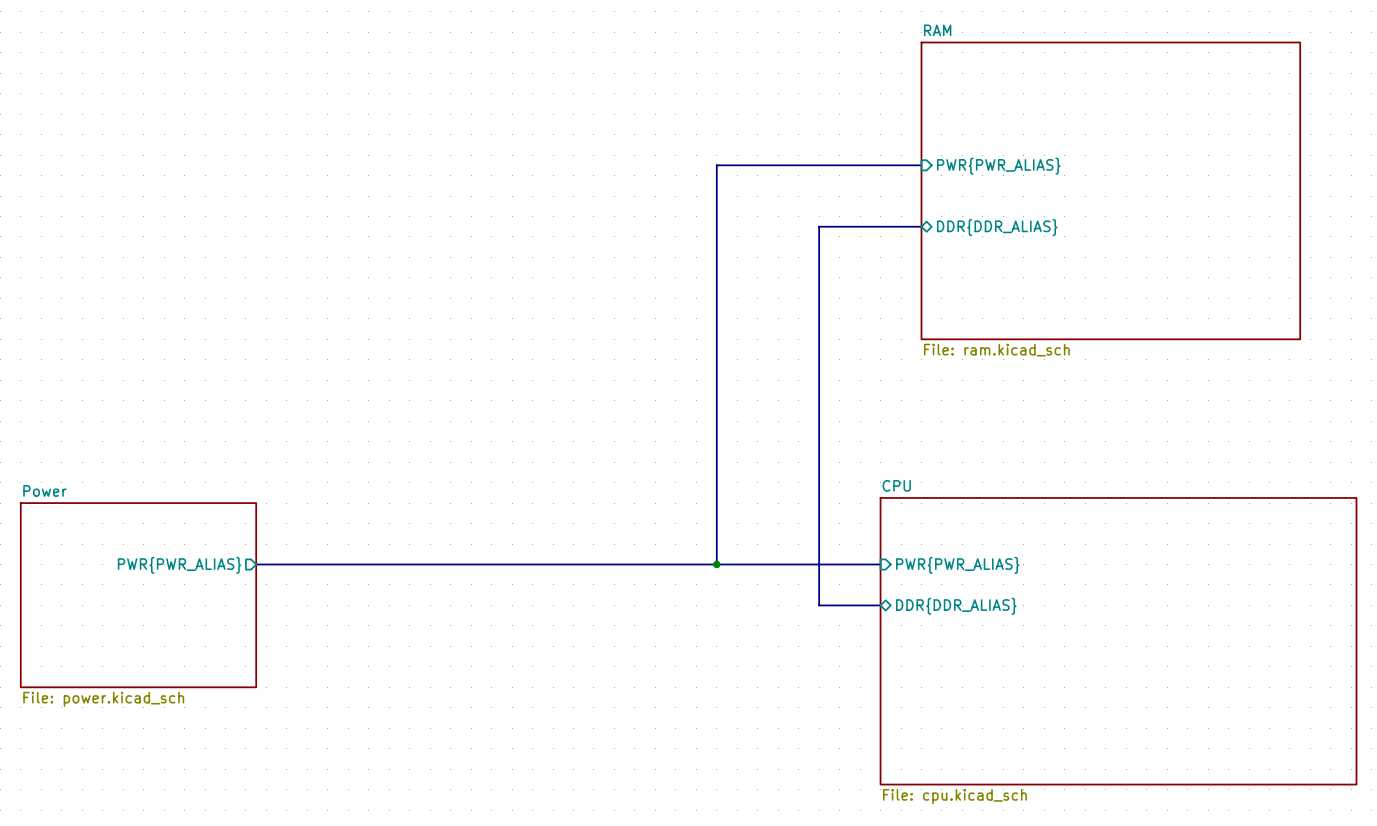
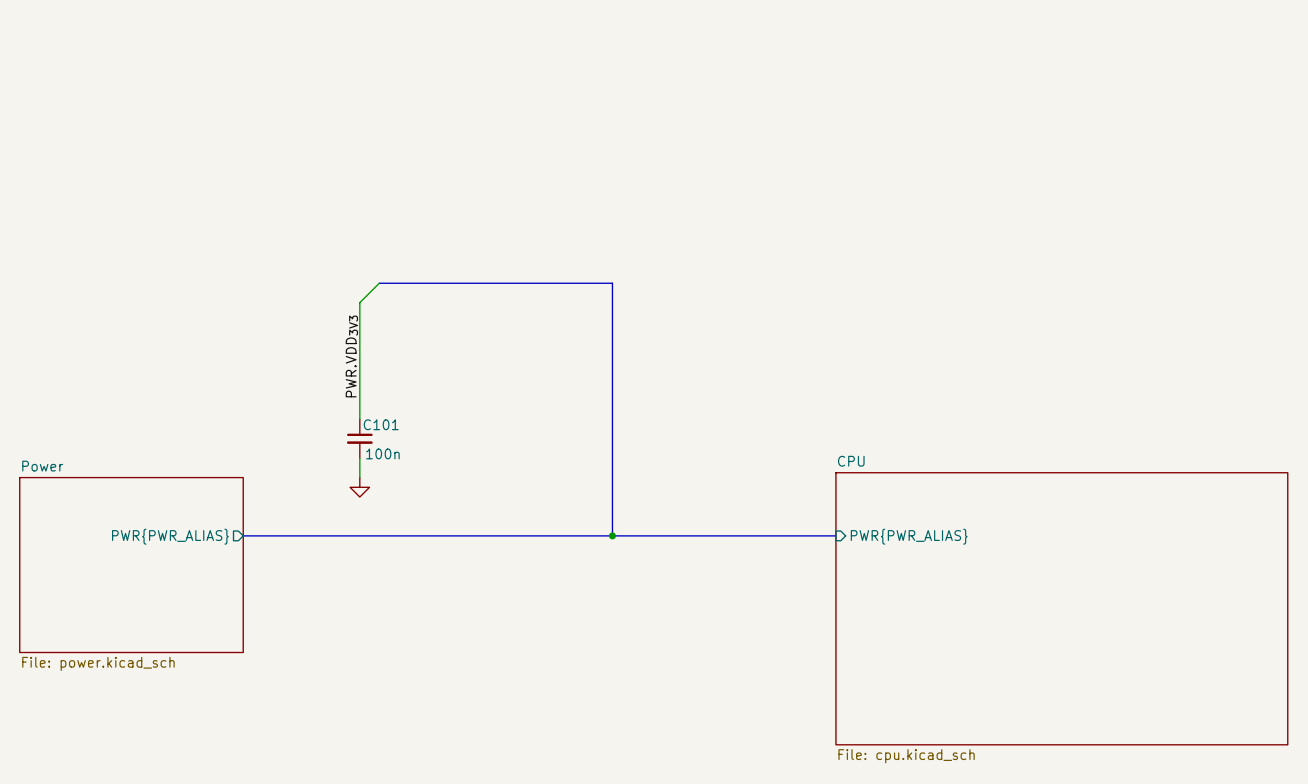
bus: (921, 165) (716, 165) (716, 564) -> none
sheet pin: PWR{PWR_ALIAS} (998, 166) -> none
sheet RAM: File: ram.kicad_sch (1110, 190) -> none
bus: (921, 226) (819, 226) (819, 605) (880, 605) -> none
sheet pin: DDR{DDR_ALIAS} (997, 227) -> none
bus: none -> (379, 283) (612, 283) (612, 535)
wire: none -> (379, 283) (359, 302) (359, 419)
label: none -> PWR.VDD3V3 (351, 356)
C101: none -> 100n (359, 438)
wire: none -> (359, 458) (359, 477)
power symbol: none -> (359, 487)
junction: none -> (612, 535)
junction: (716, 564) -> none
sheet pin: DDR{DDR_ALIAS} (956, 606) -> none

